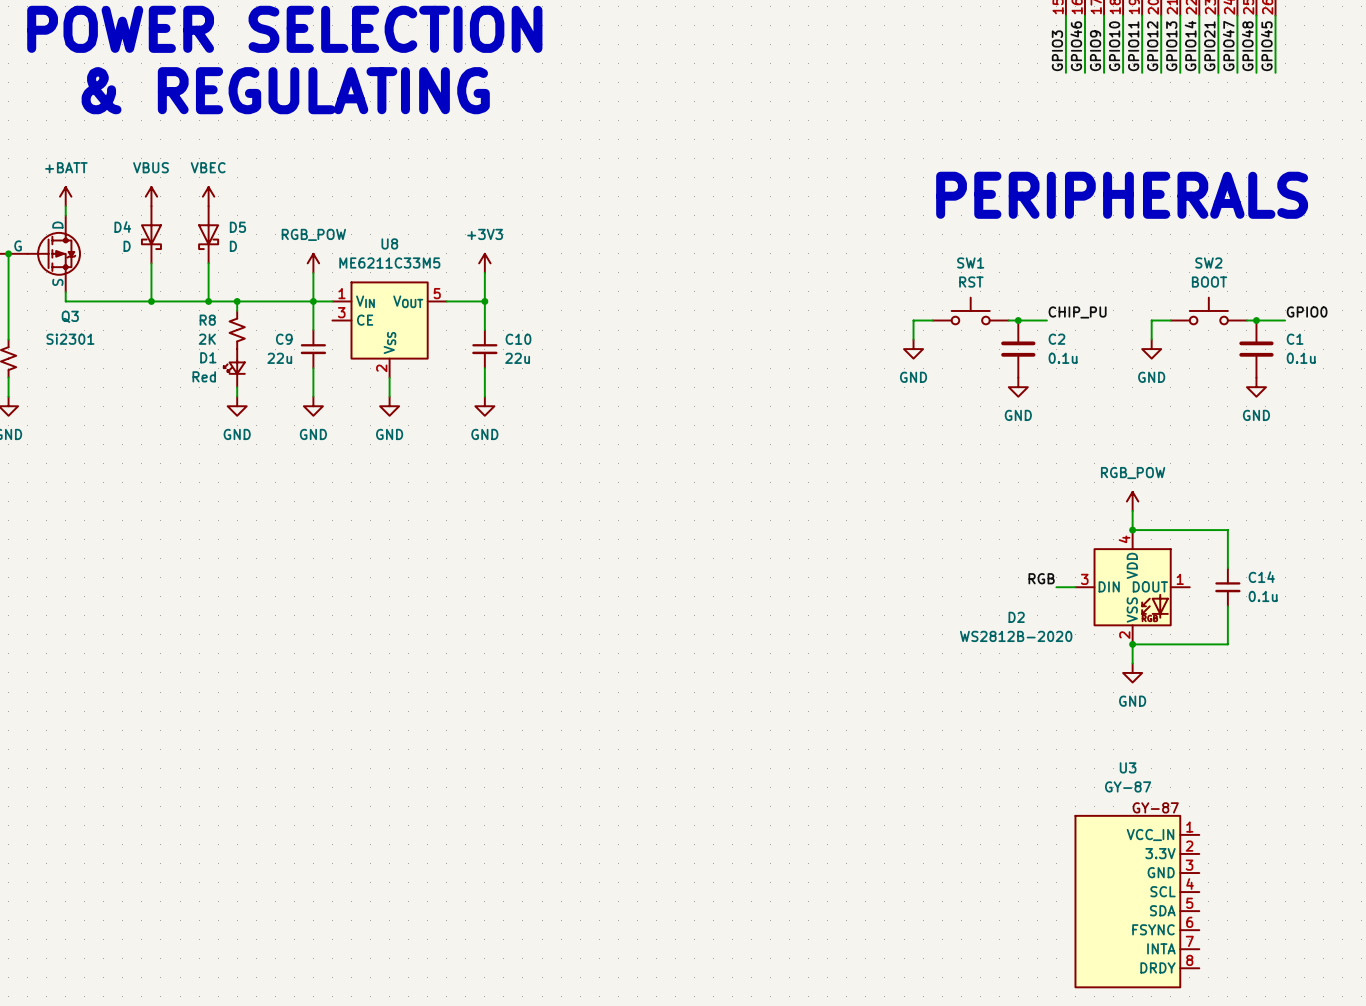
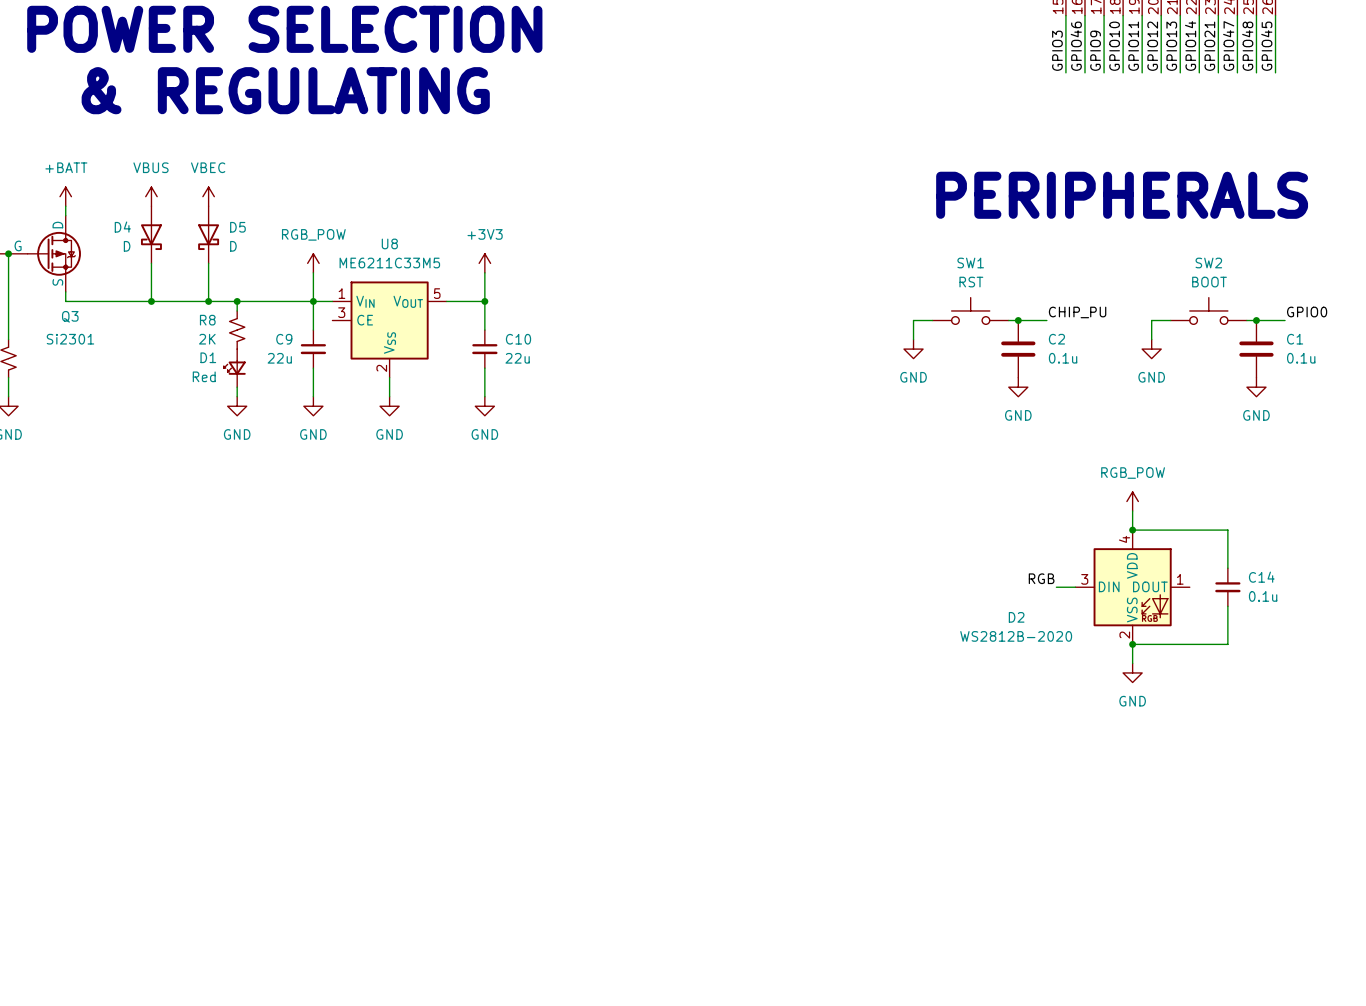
U3: GY-87 (1137, 901) -> none

